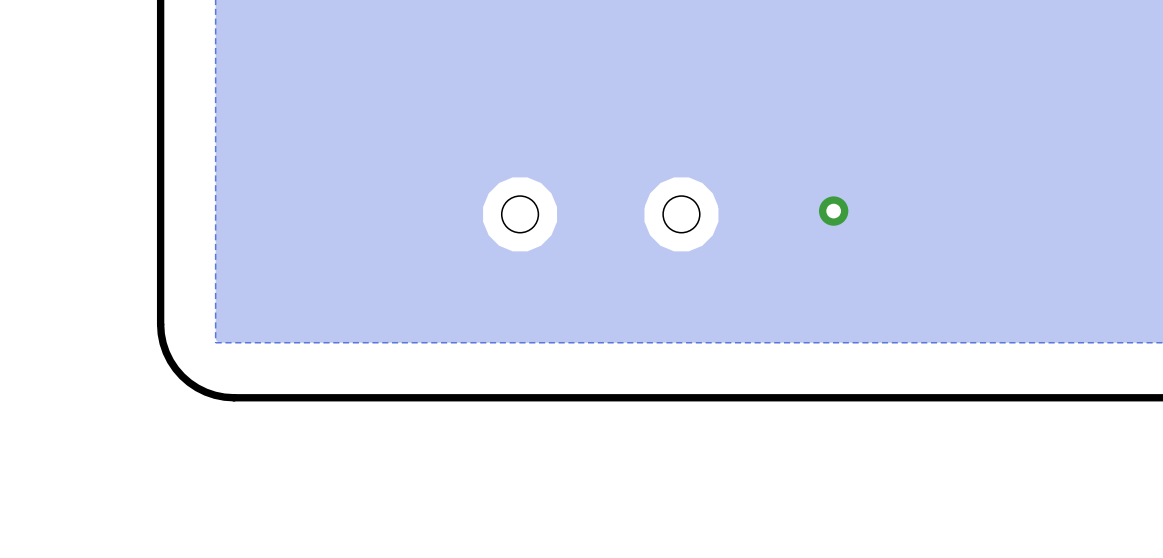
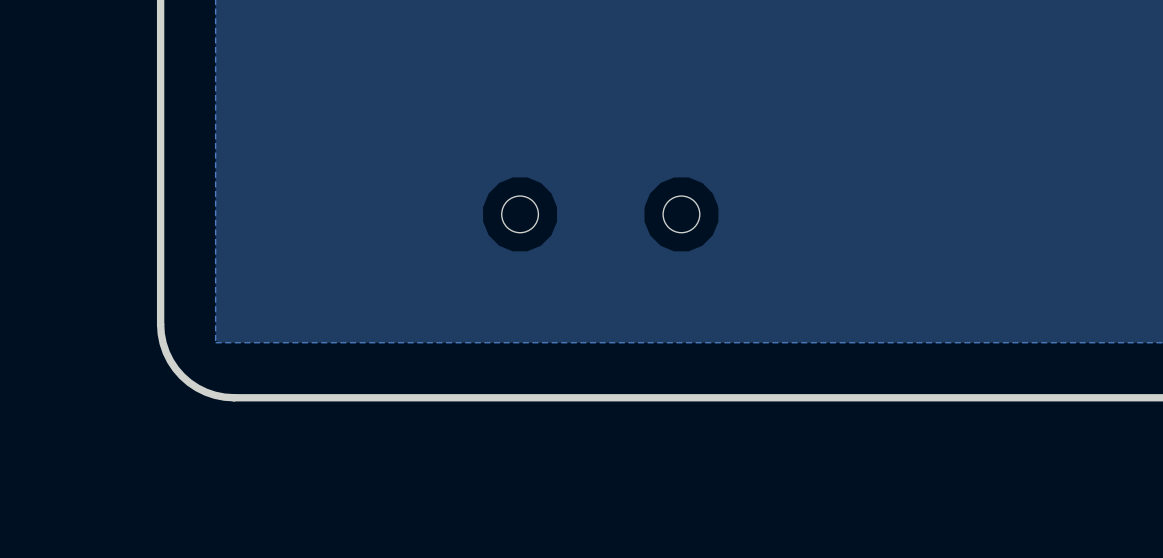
via: (833, 211) -> none

